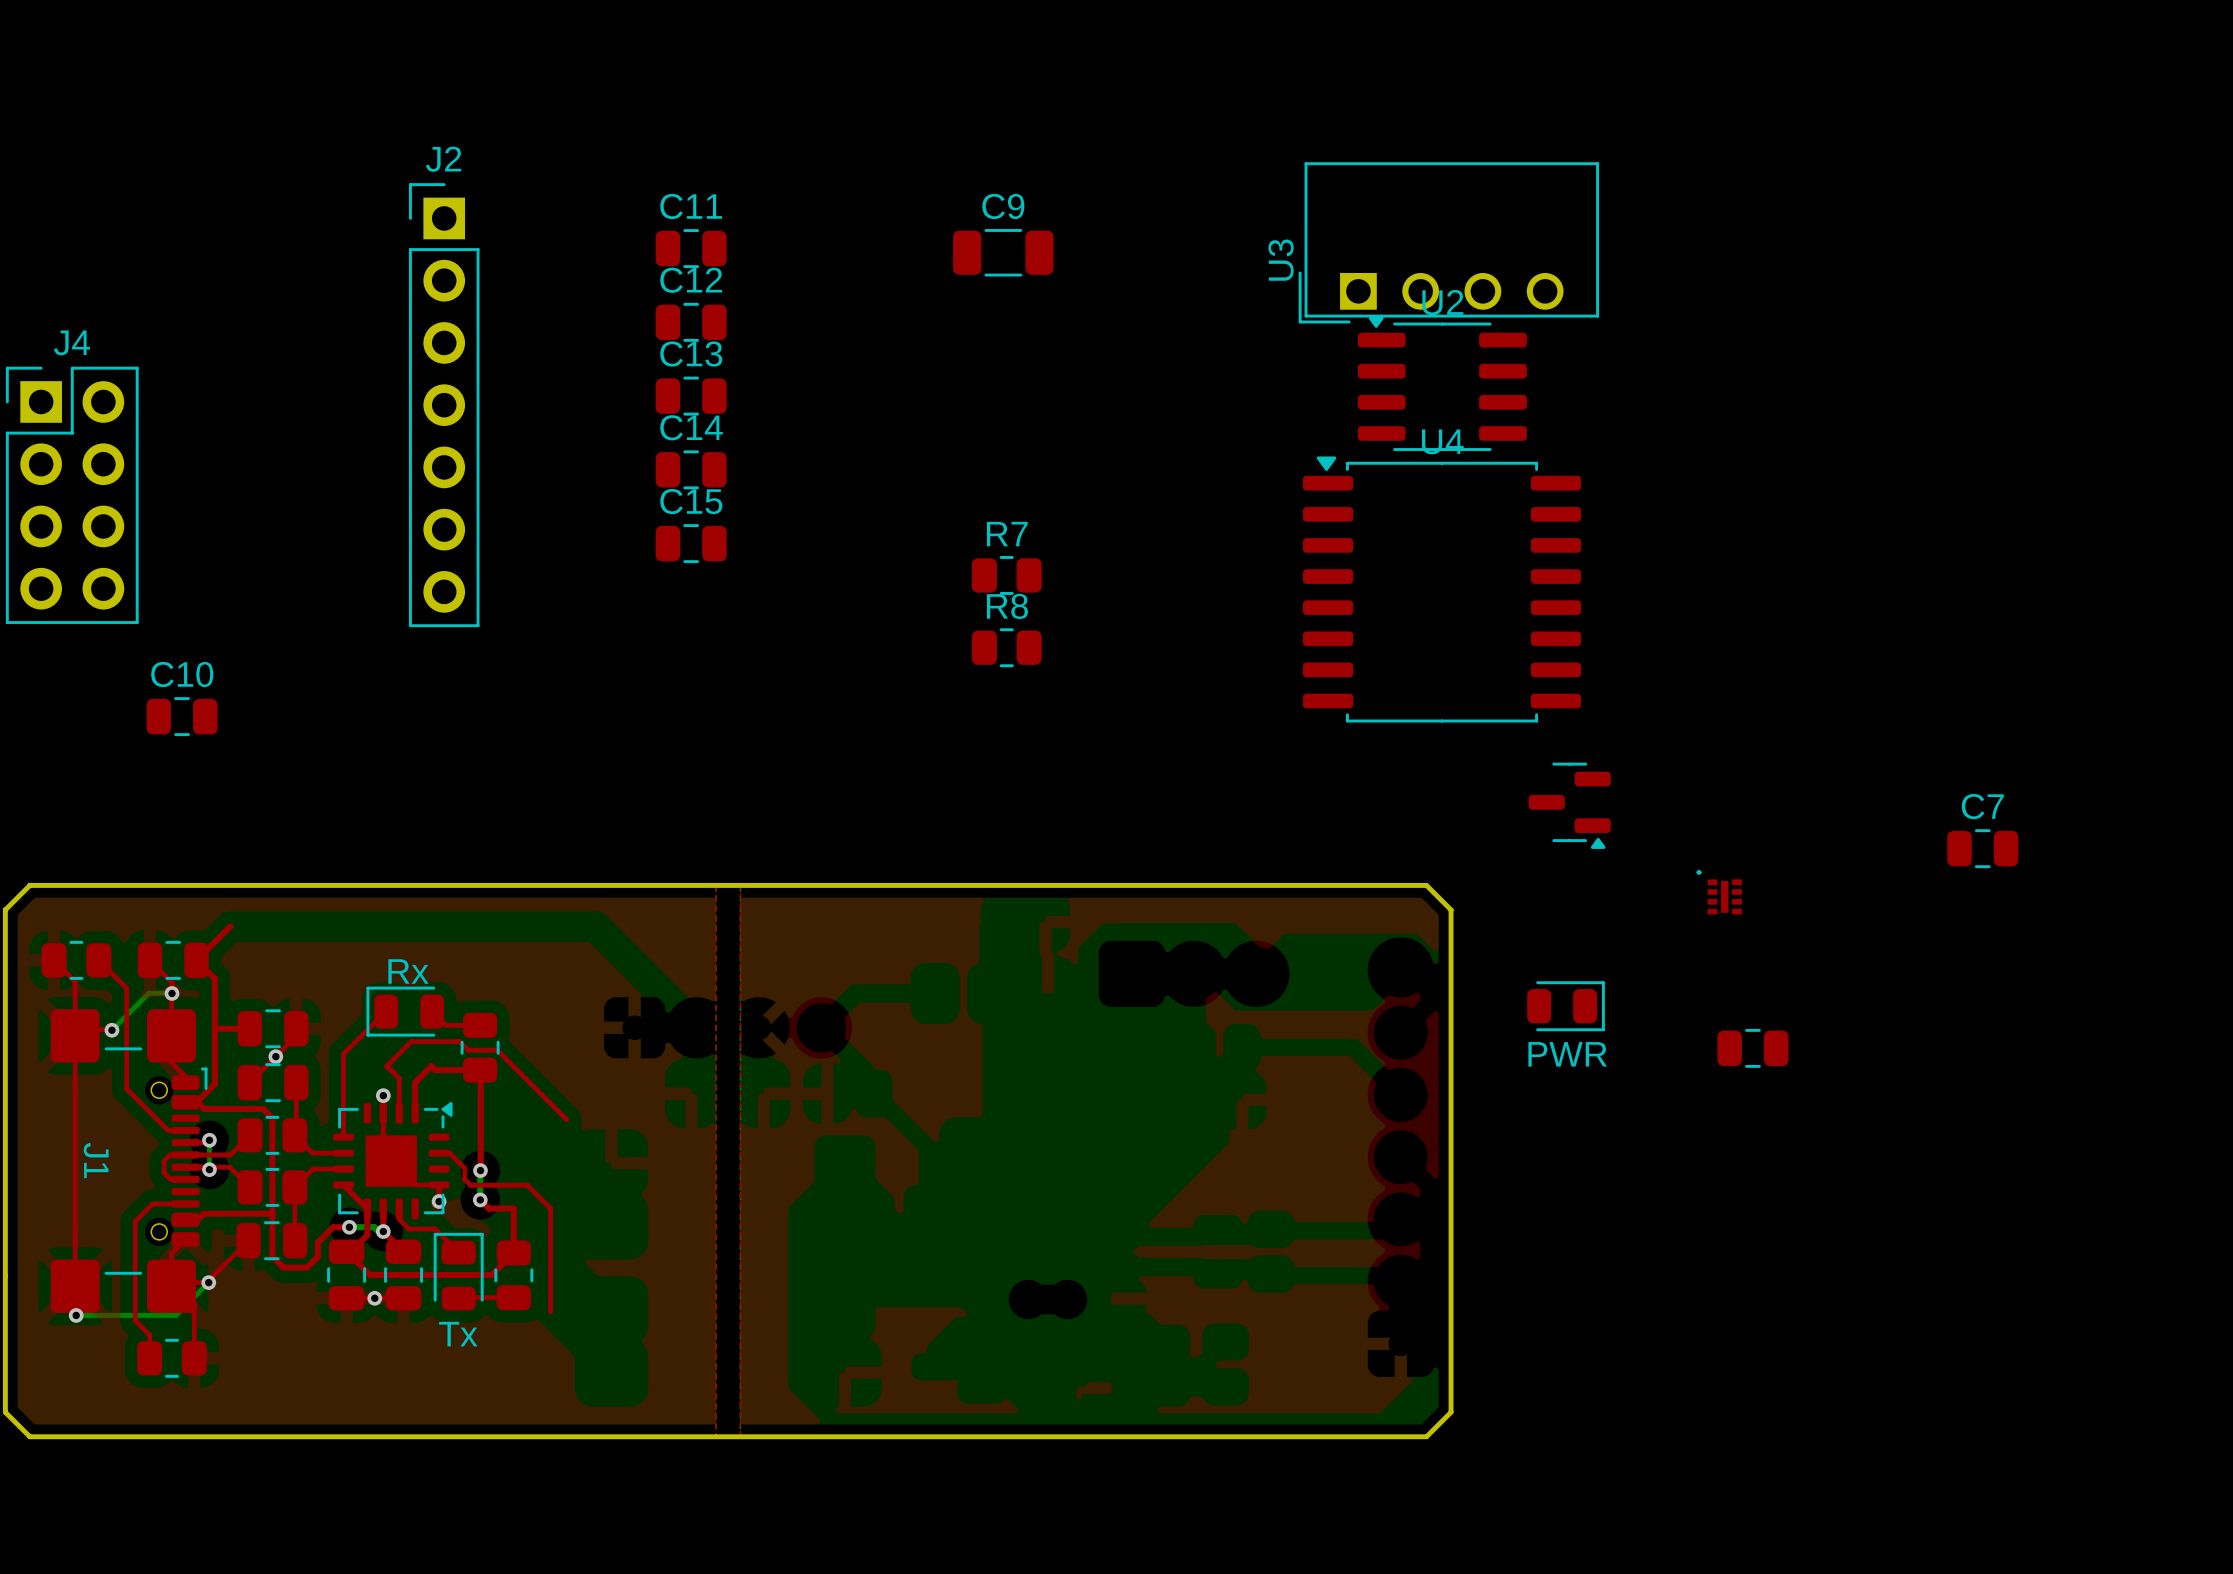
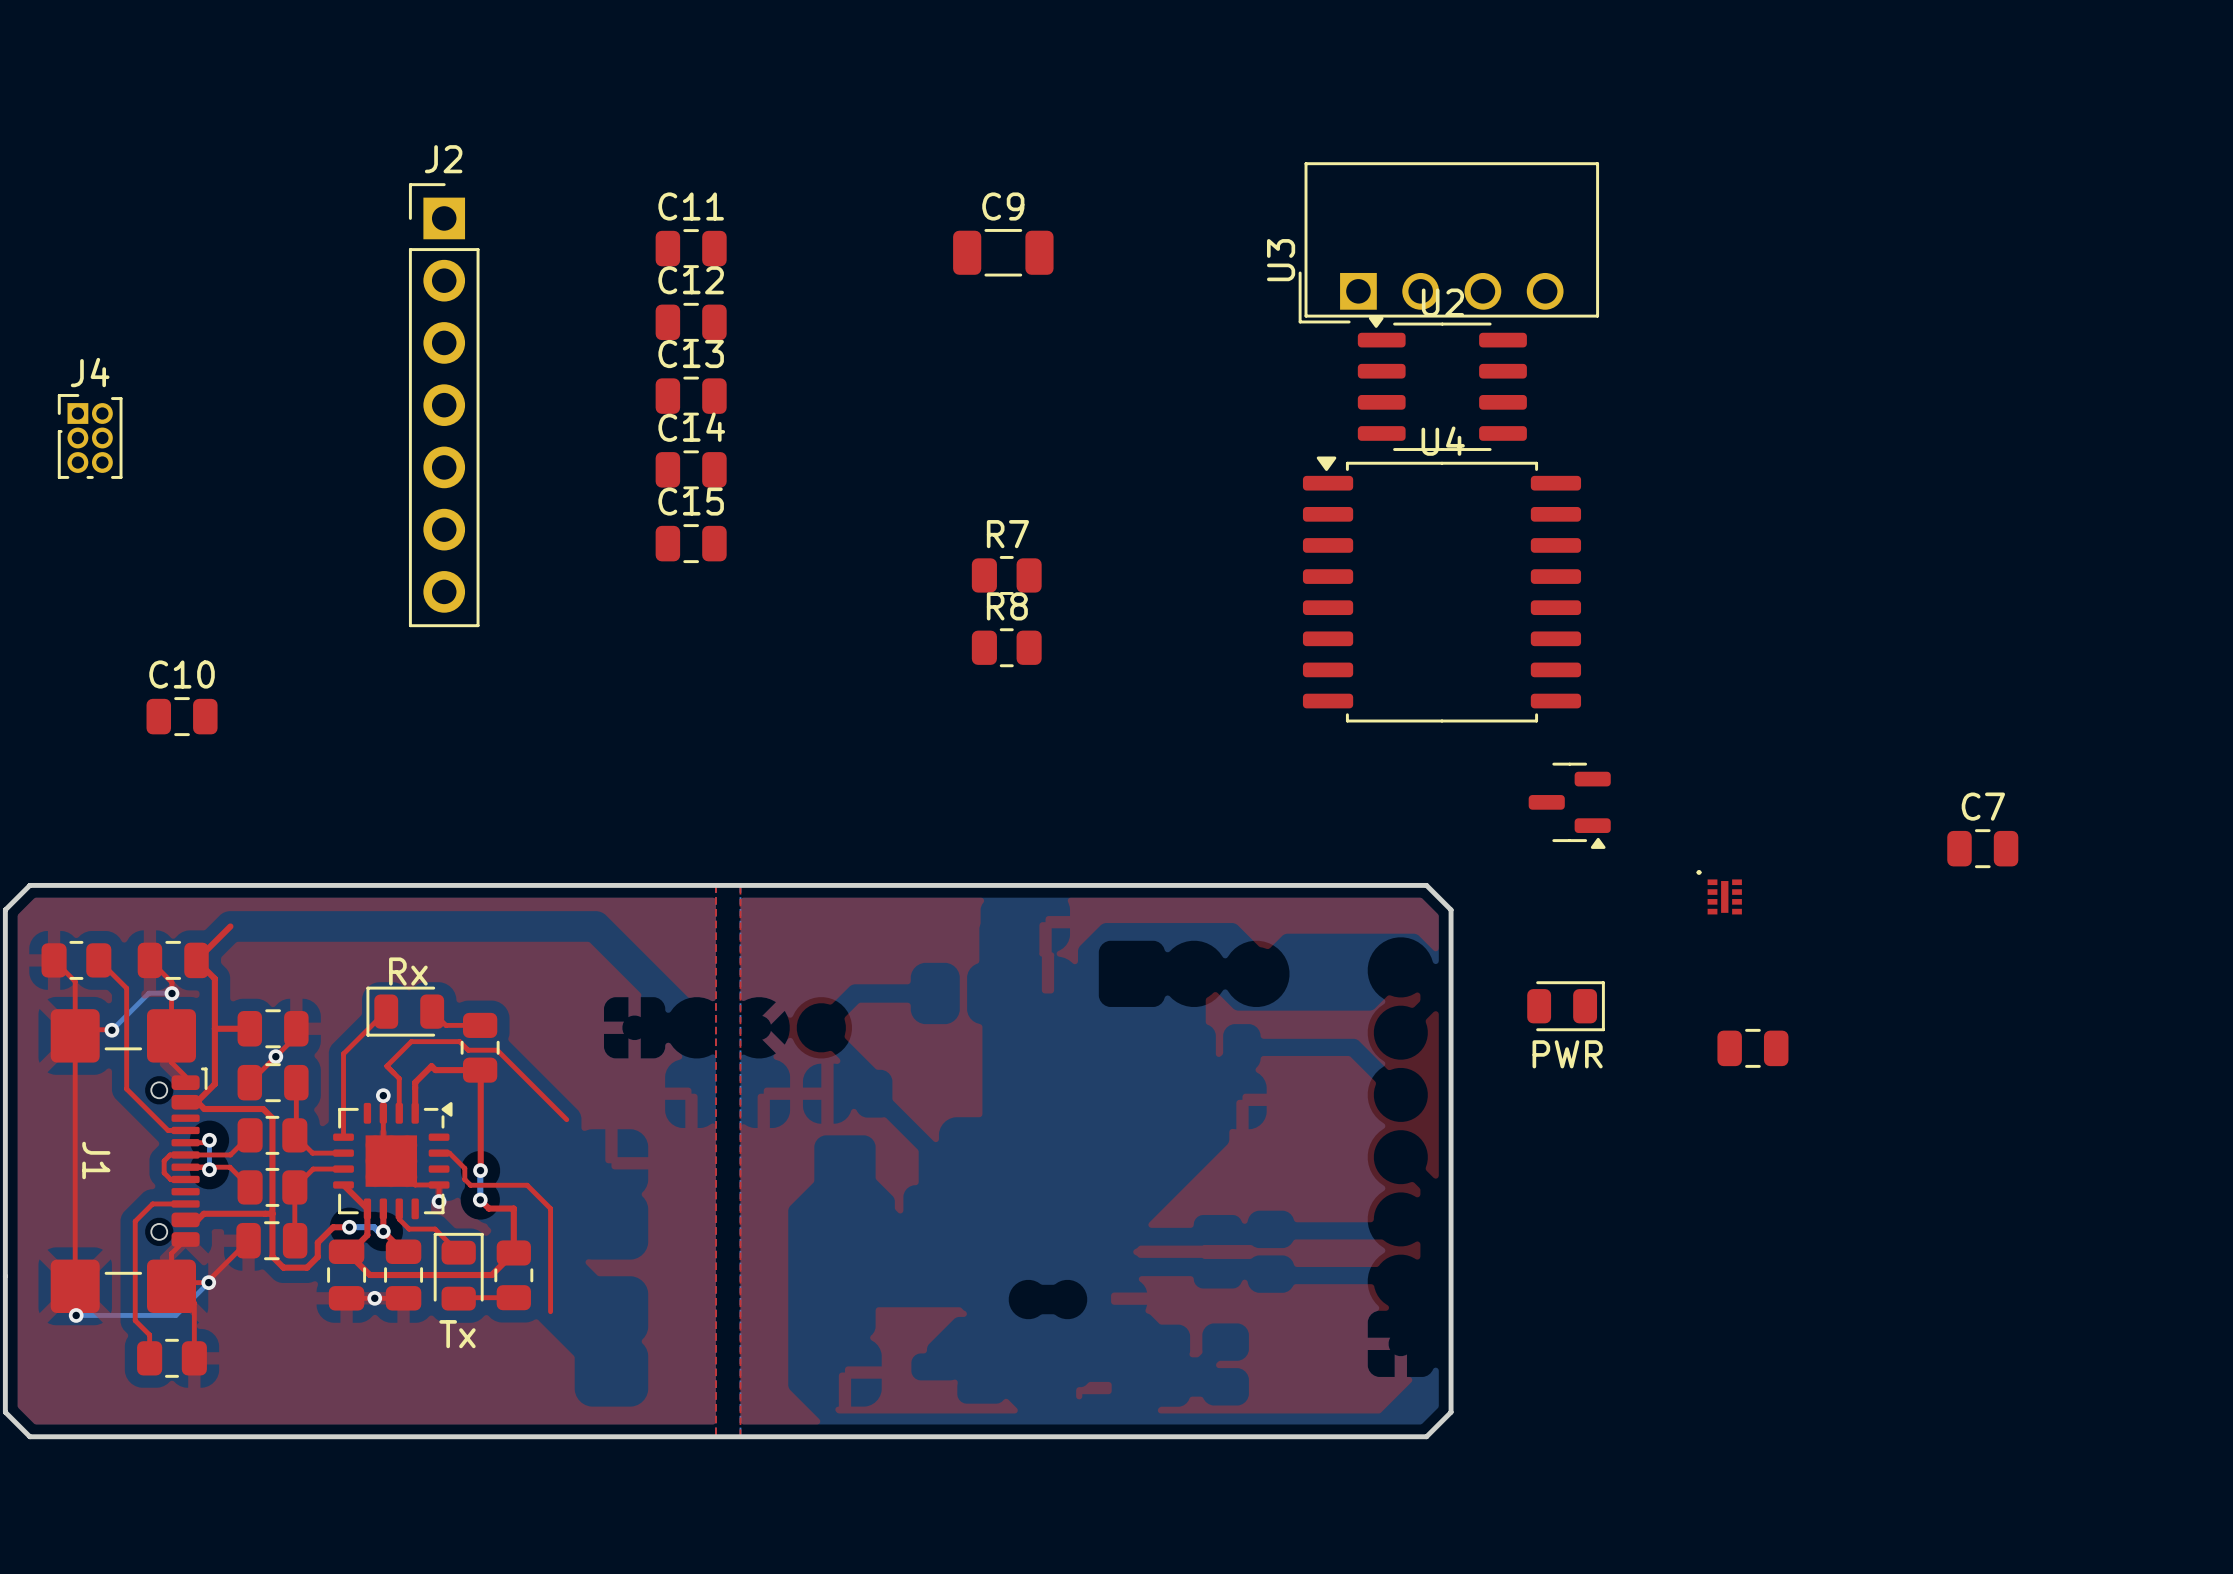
J4 name position: J4 (72, 342) -> J4 (90, 372)
J4 footprint: [5, 366, 139, 624] -> [57, 394, 123, 479]

